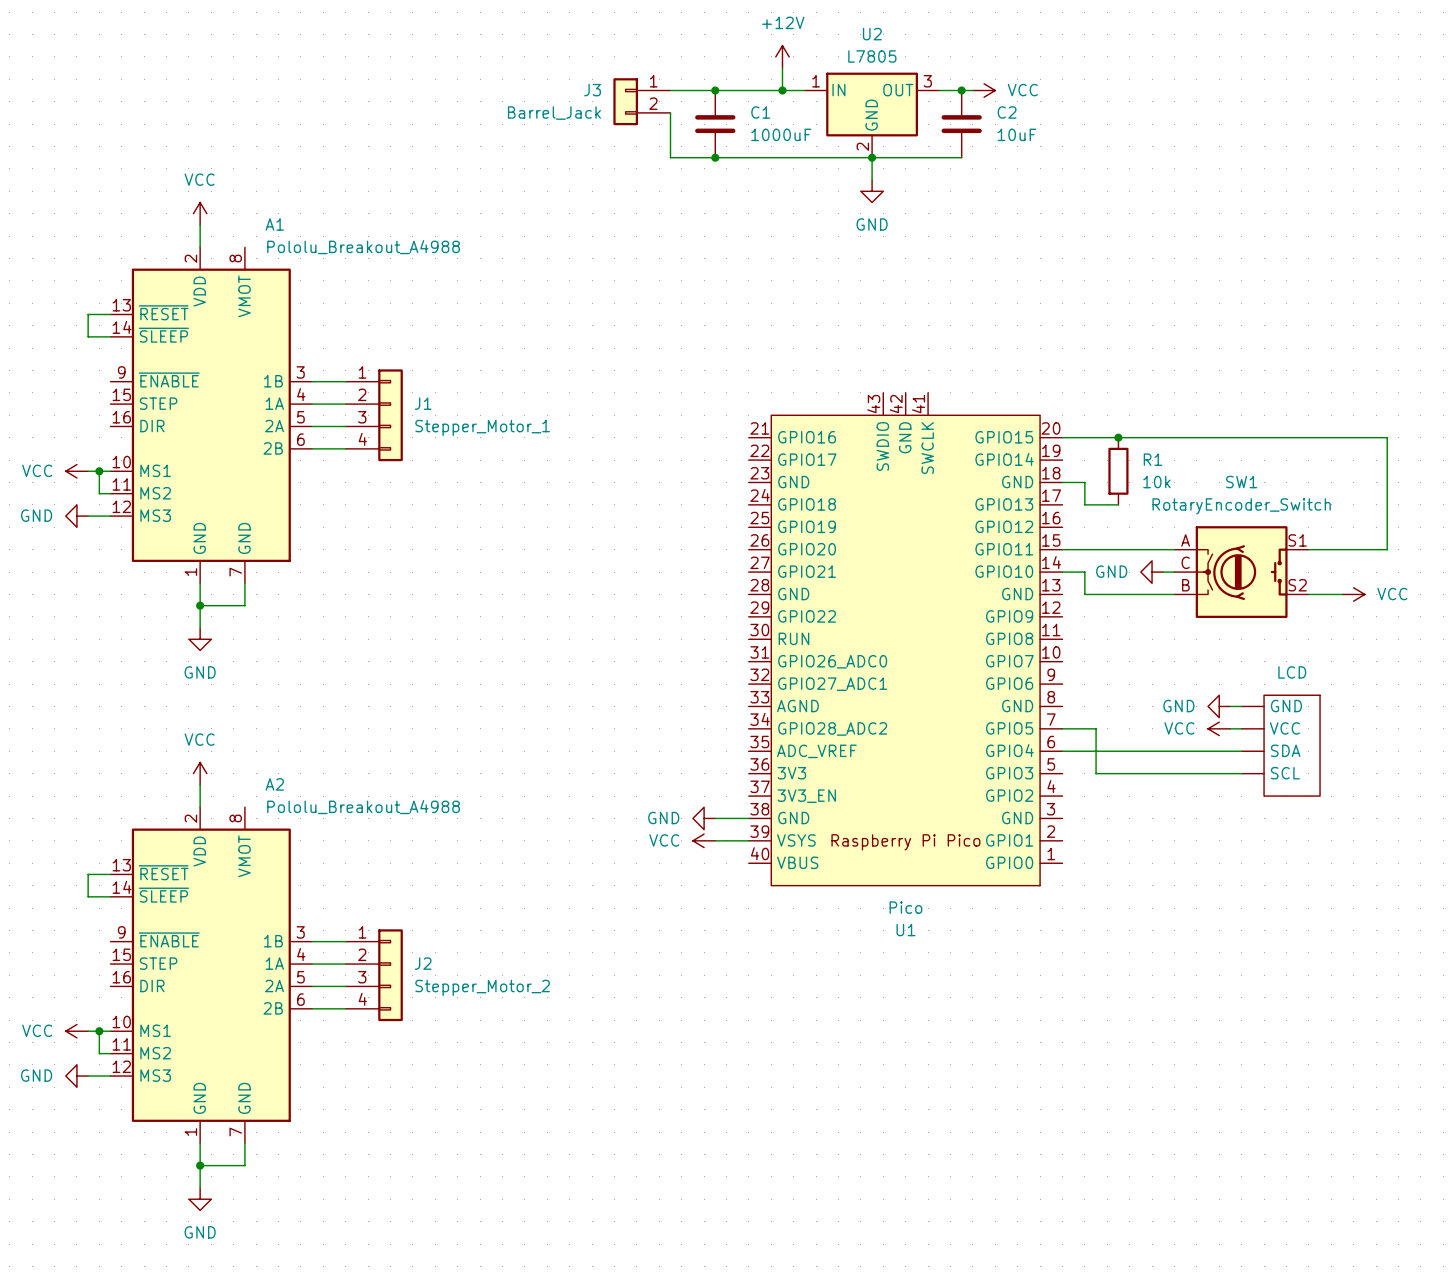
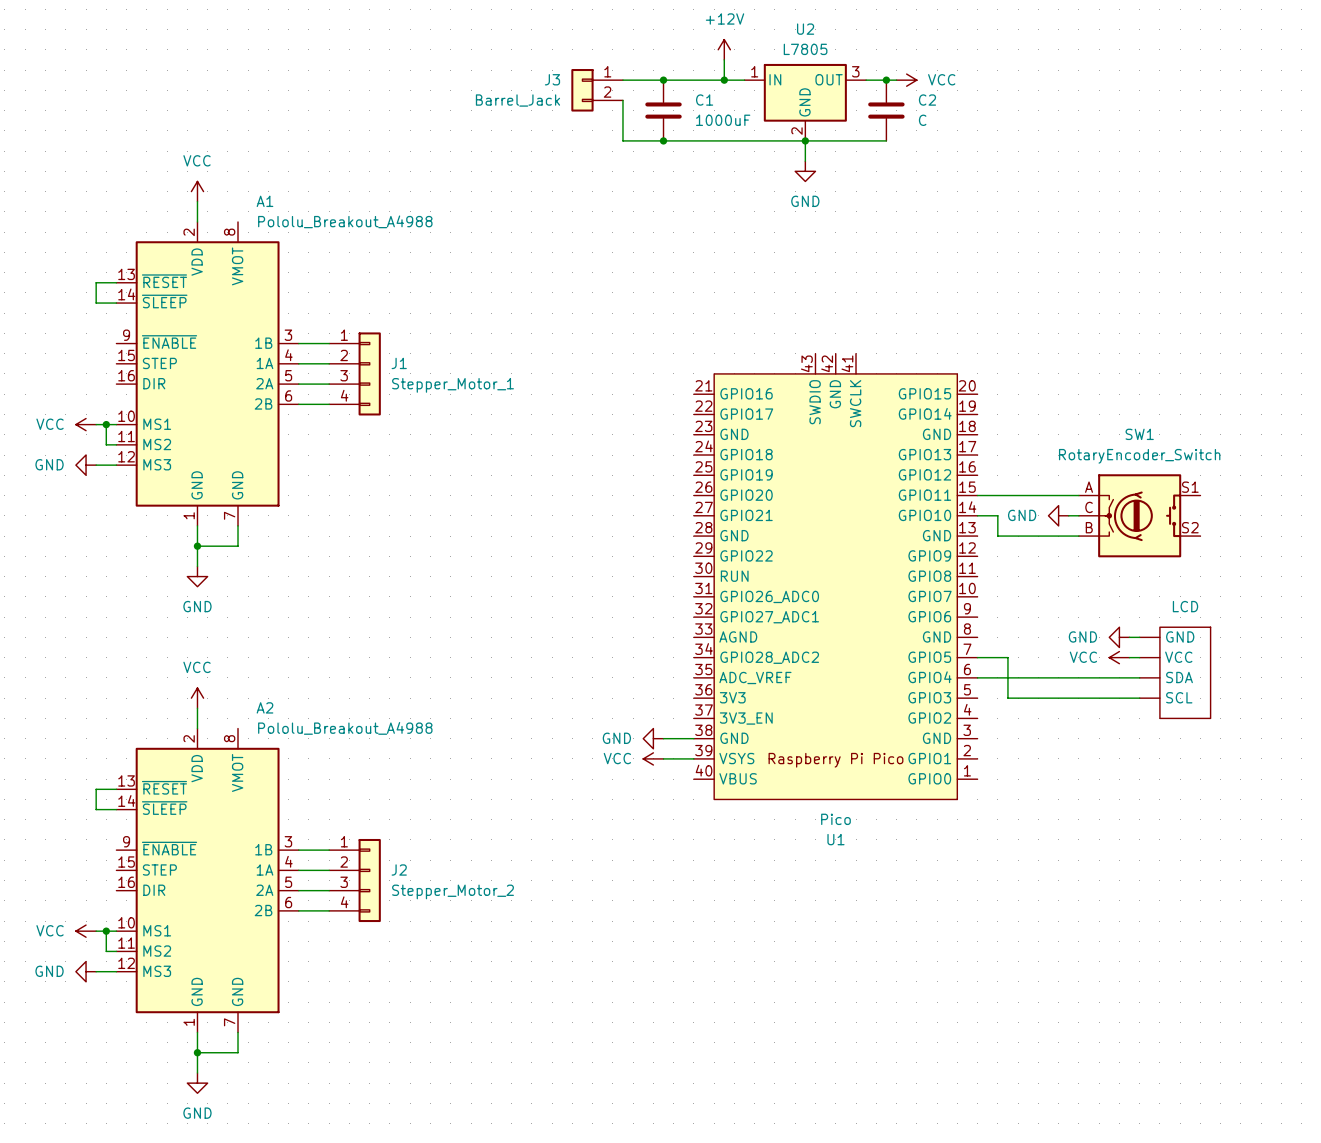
C2 value: 10uF (1016, 134) -> C (922, 120)
wire: (1062, 437) (1387, 437) (1387, 549) (1308, 549) -> none
junction: (1118, 437) -> none
R1: 10k (1118, 471) -> none
wire: (1062, 482) (1084, 482) (1084, 504) (1118, 504) -> none
wire: (1308, 594) (1342, 594) -> none
power symbol: VCC (1353, 594) -> none

